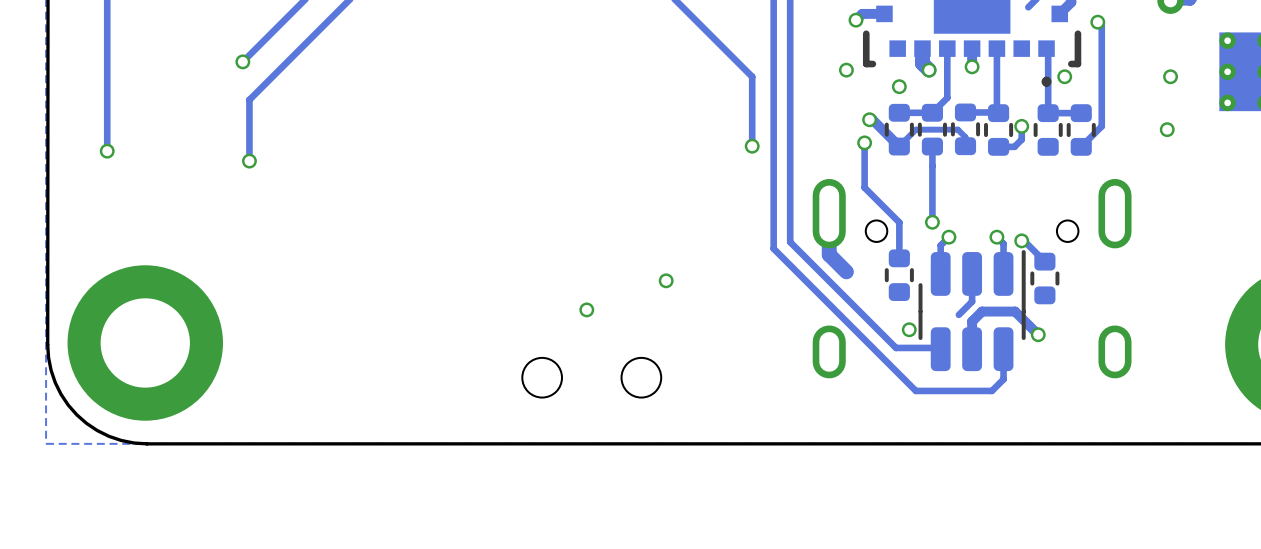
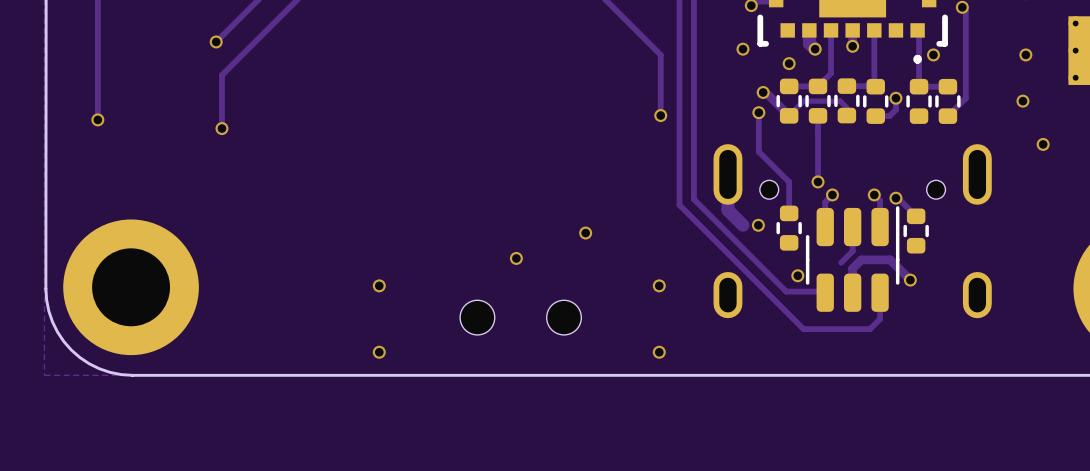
via: none -> (1043, 144)
via: none -> (758, 225)
via: none -> (379, 285)
via: none -> (659, 285)
via: none -> (379, 352)
via: none -> (659, 352)

